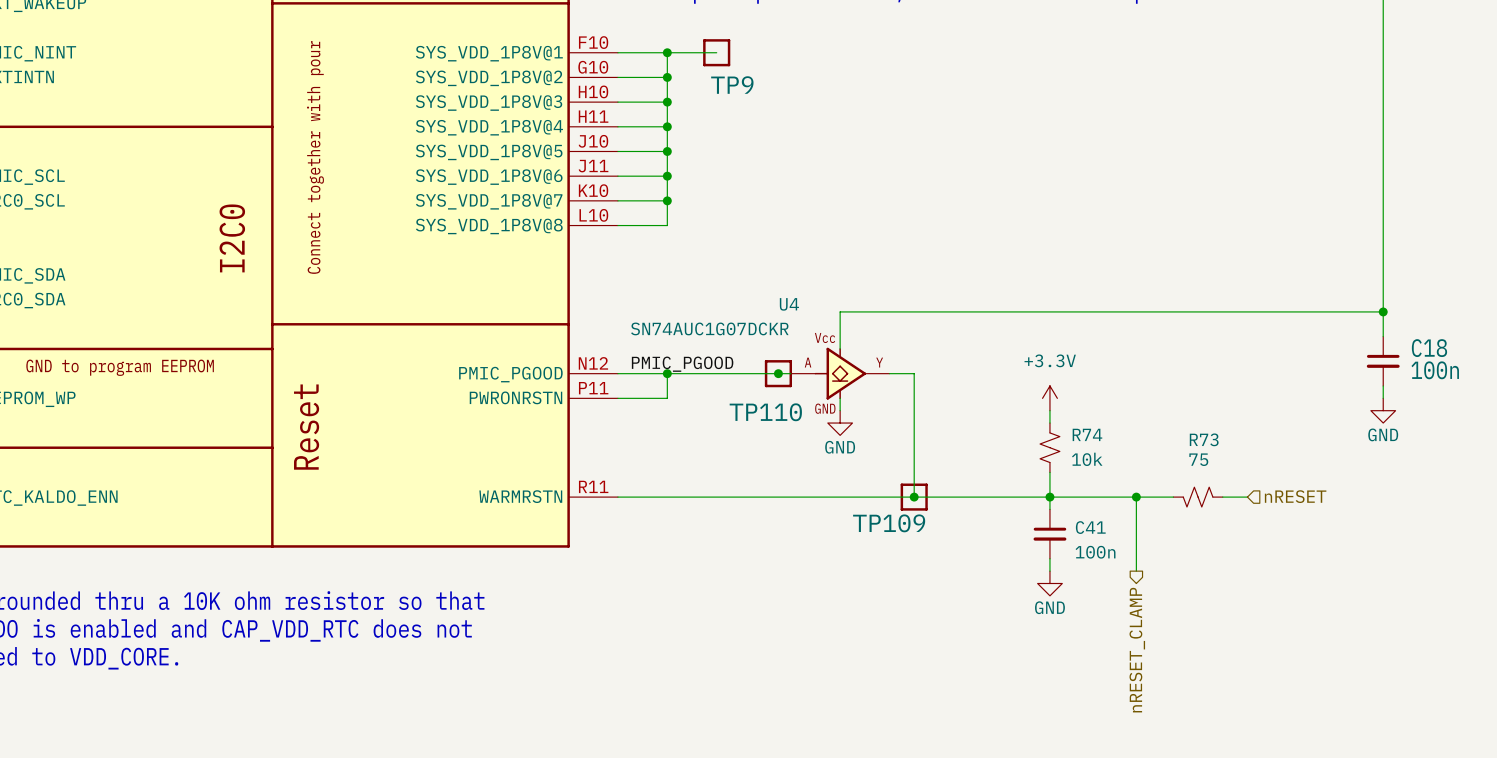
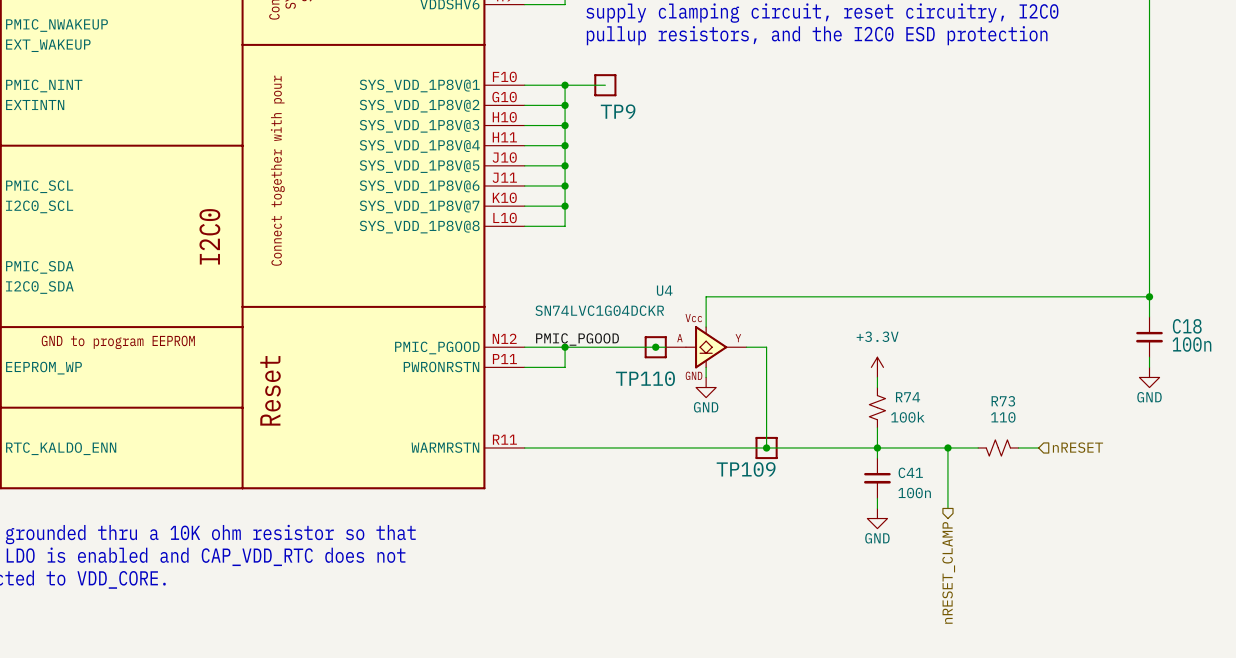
U4 value: SN74AUC1G07DCKR (709, 328) -> SN74LVC1G04DCKR (599, 310)
R74 value: 10k (1087, 459) -> 100k (907, 417)
R73 value: 75 (1198, 459) -> 110 (1003, 417)

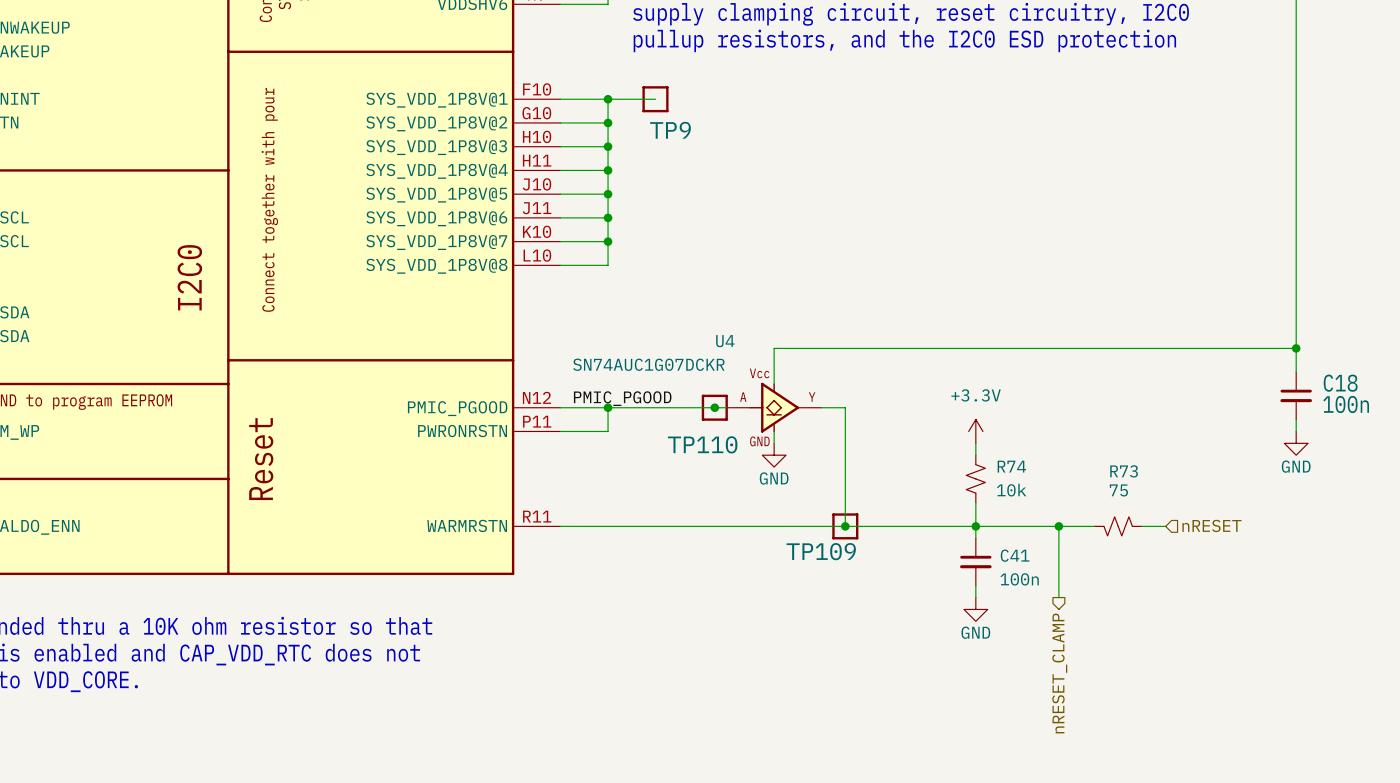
U4 value: SN74LVC1G04DCKR (599, 310) -> SN74AUC1G07DCKR (648, 364)
R74 value: 100k (907, 417) -> 10k (1011, 490)
R73 value: 110 (1003, 417) -> 75 (1118, 490)

